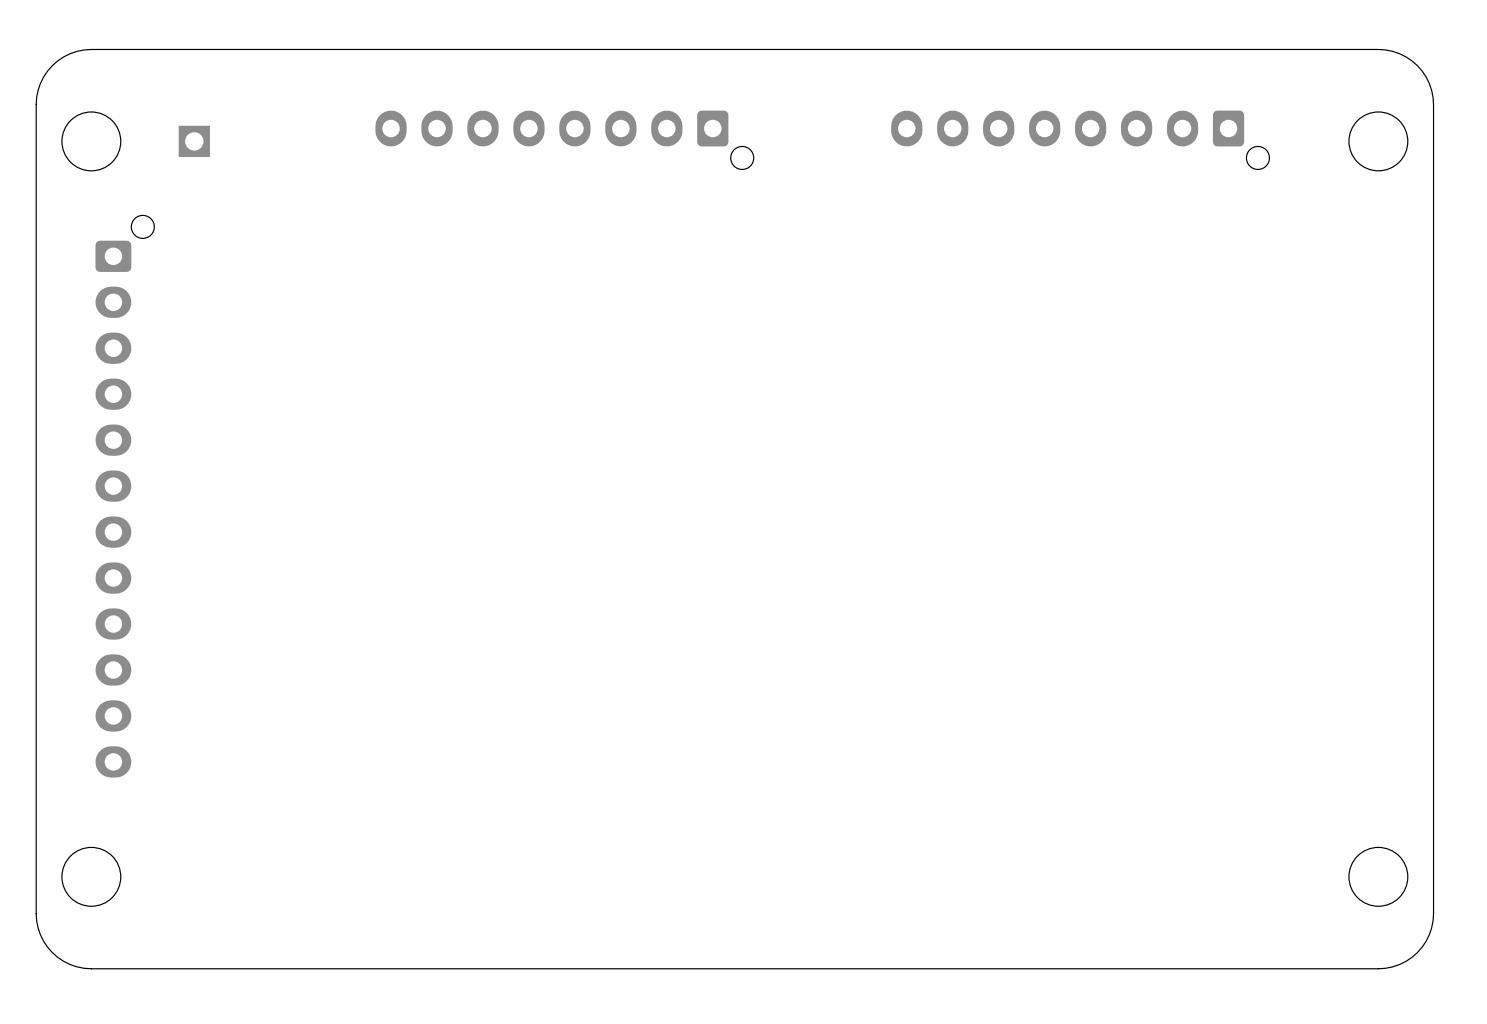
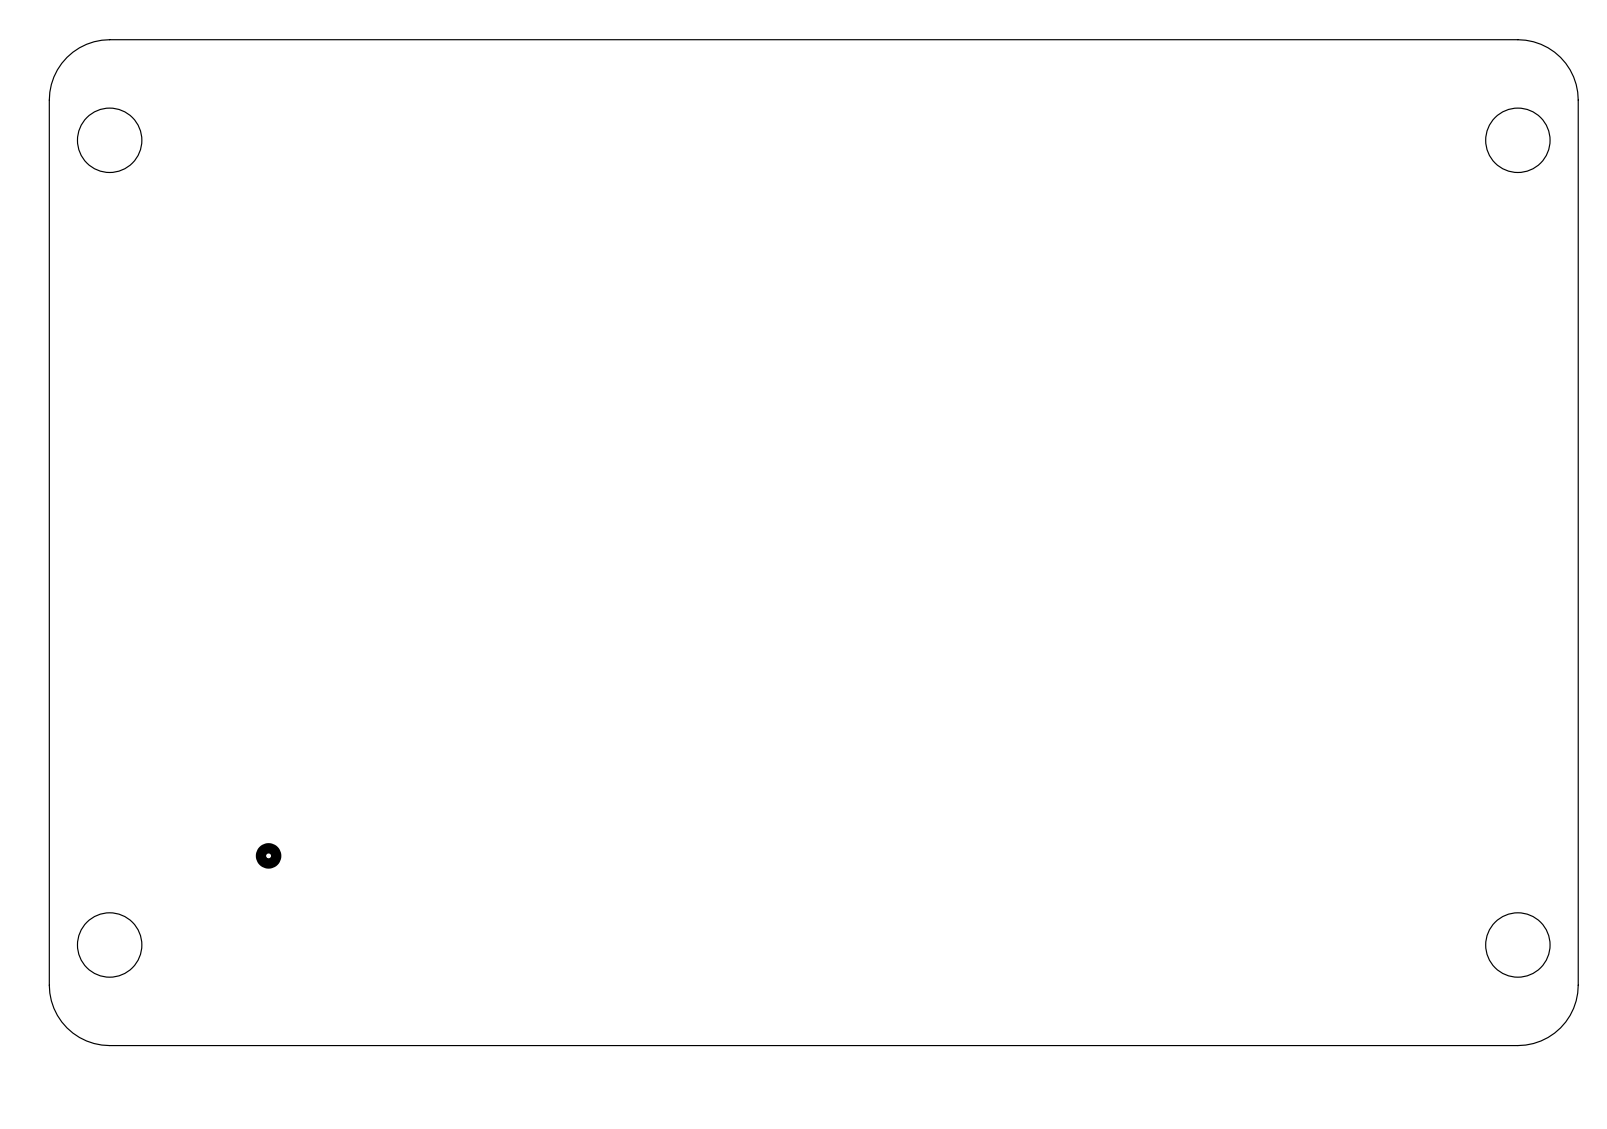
part: (564, 140) -> none
part: (1080, 140) -> none
part: (194, 141) -> none
part: (124, 496) -> none
part: none -> (268, 855)

